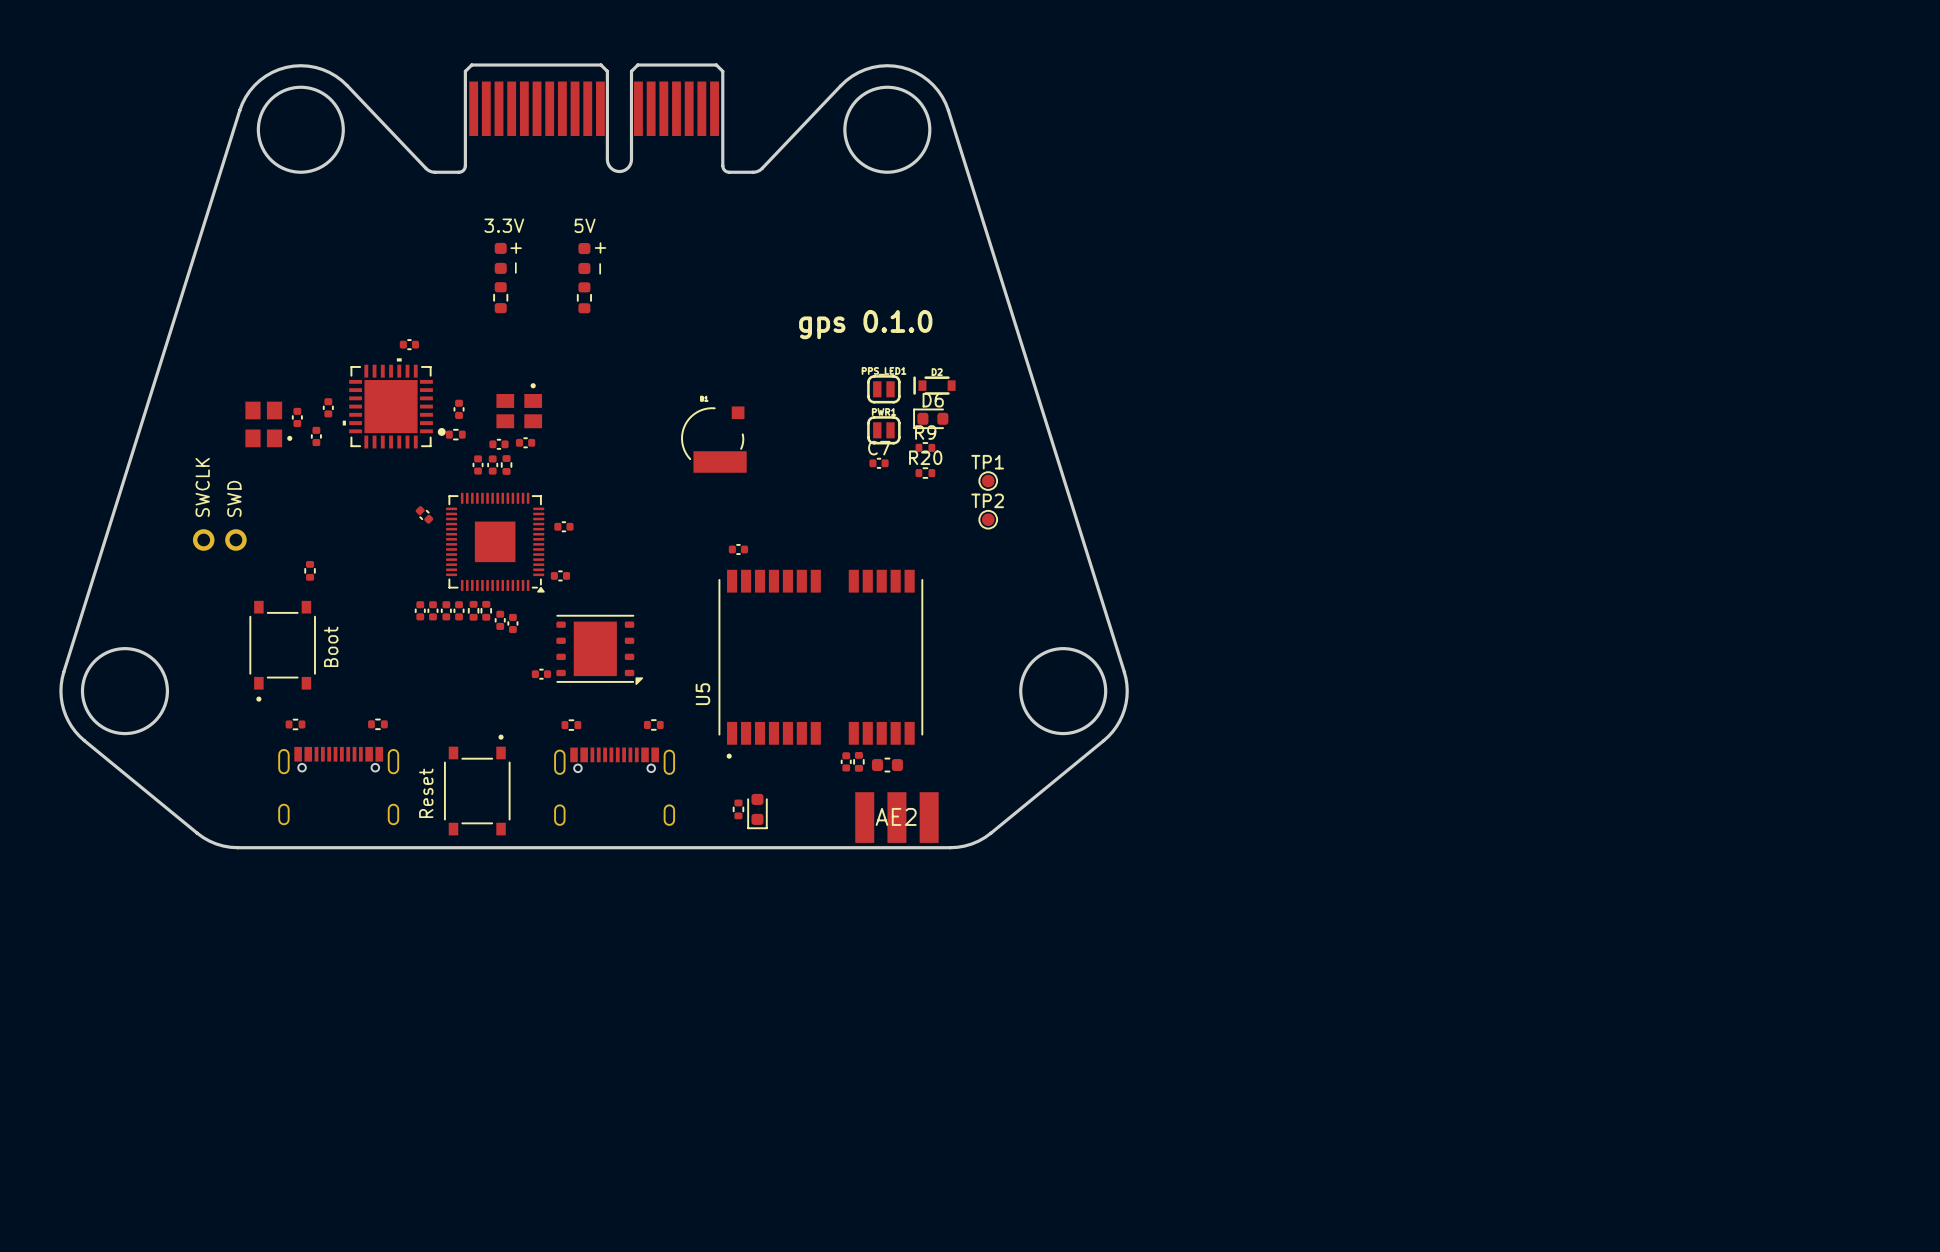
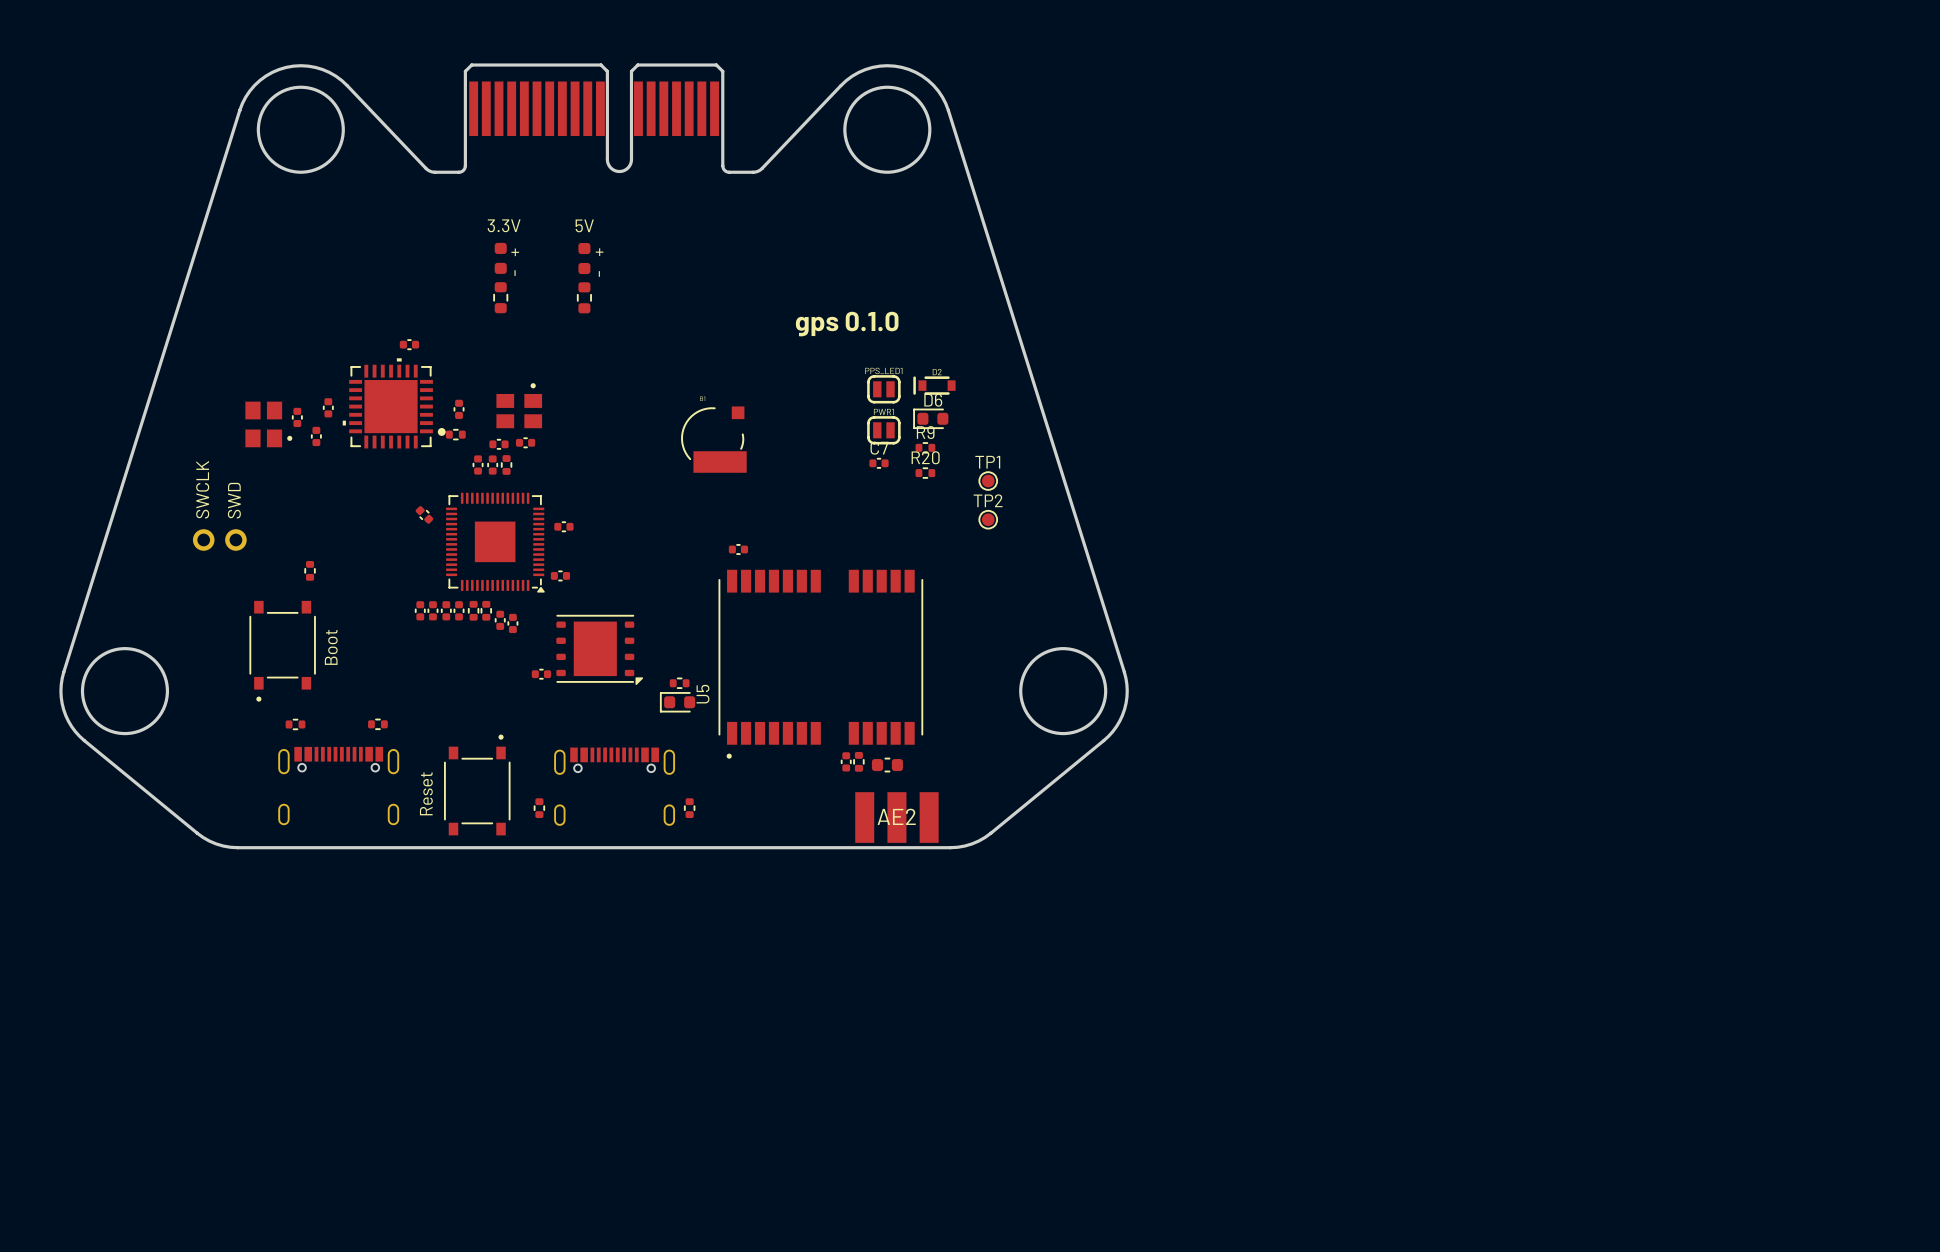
part: none -> (679, 683)
part: (653, 724) -> none
part: (571, 725) -> none
part: none -> (539, 808)
part: none -> (689, 808)
part: (738, 809) -> none
part rotation: 0° (757, 811) -> 90° clockwise (677, 702)
part position: (757, 811) -> (677, 702)

